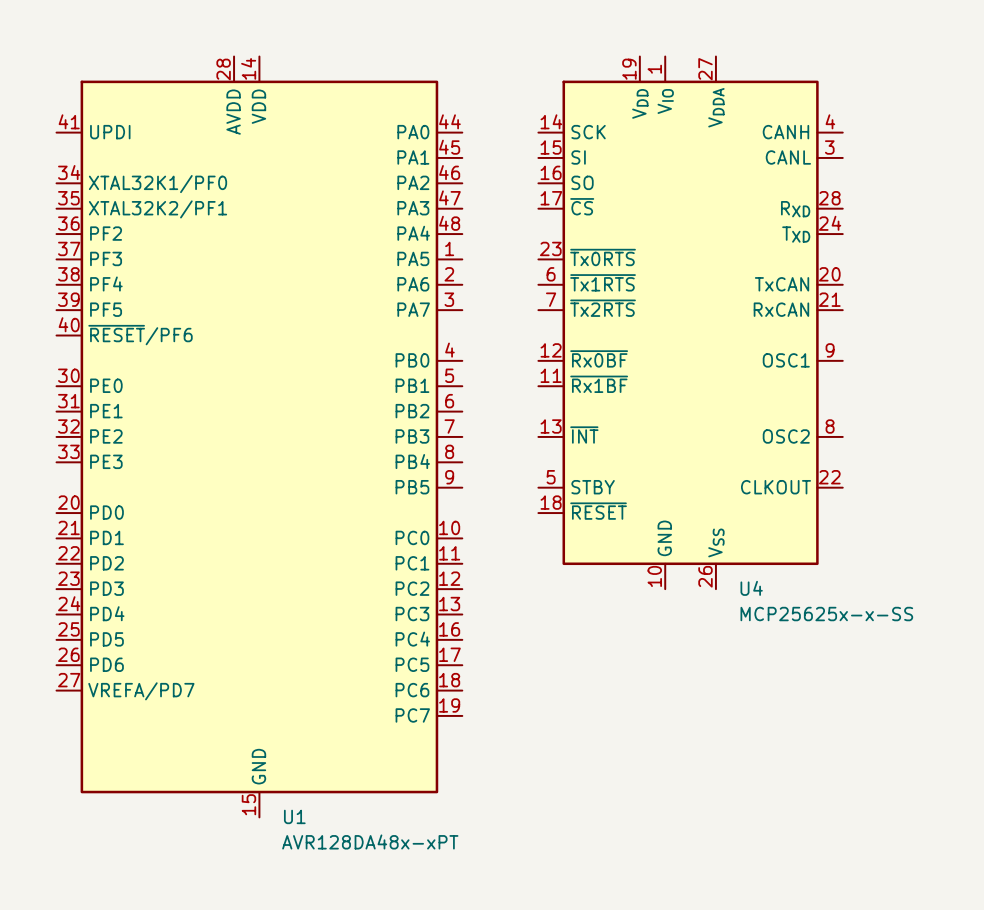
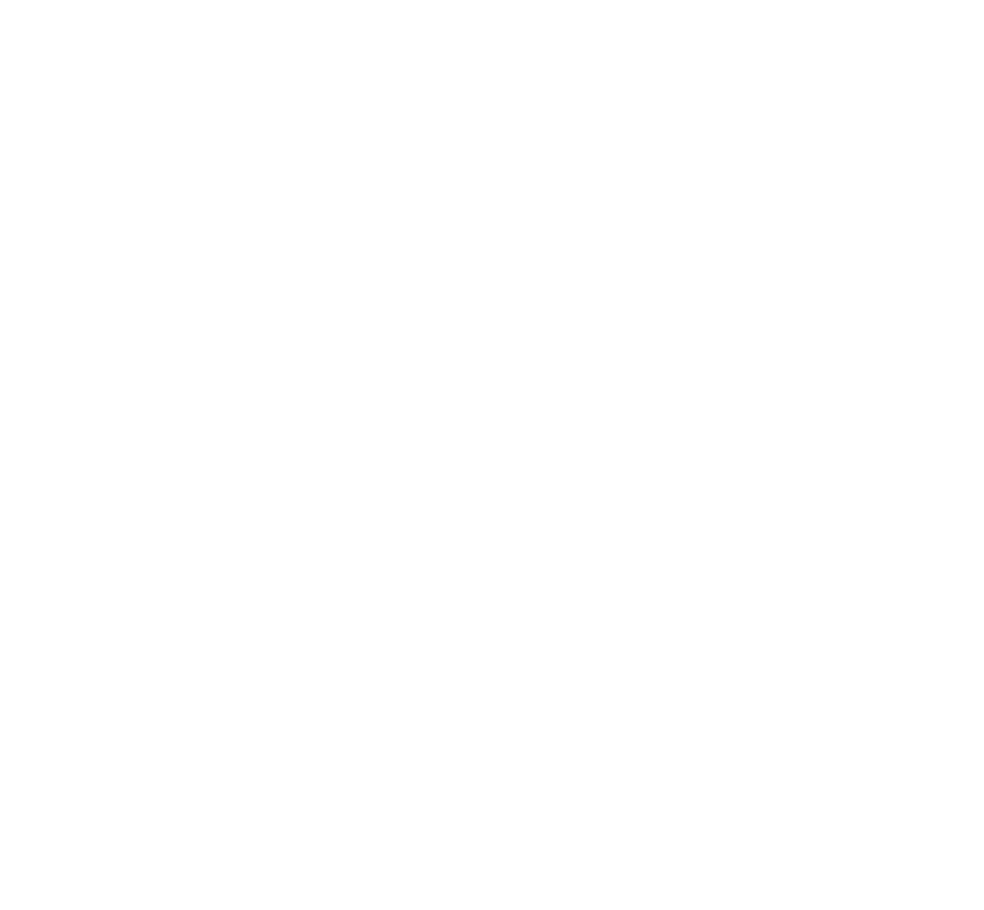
U4: MCP25625x-x-SS (690, 322) -> none
U1: AVR128DA48x-xPT (259, 436) -> none

